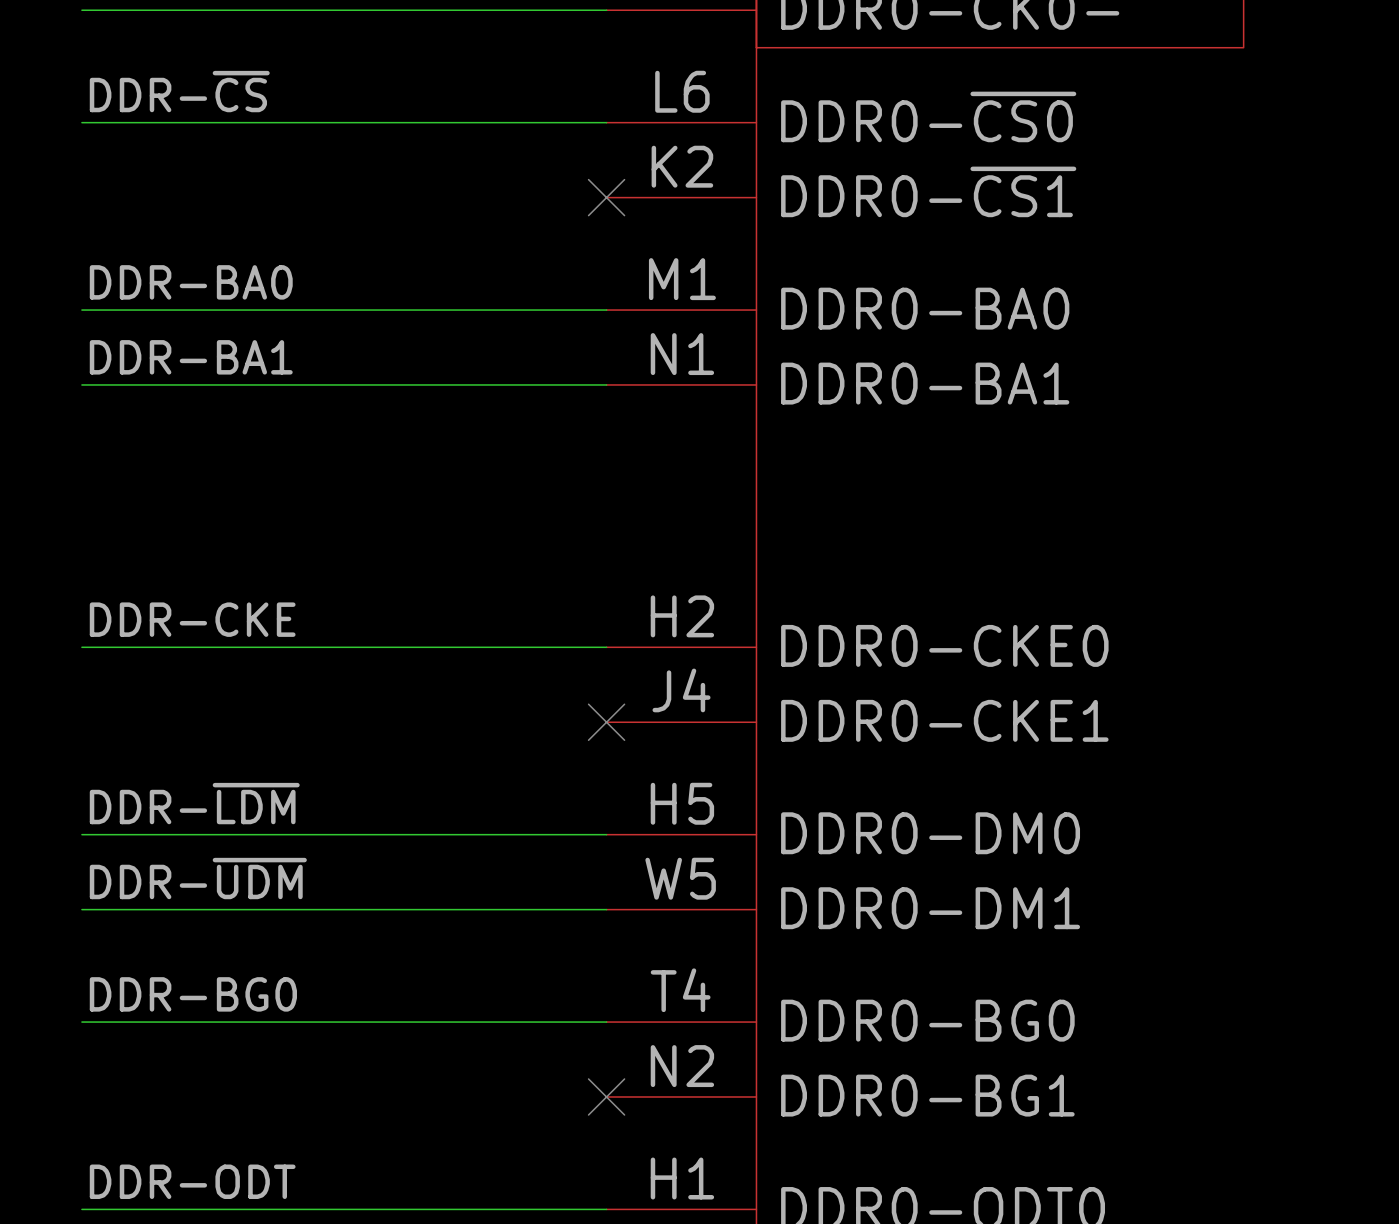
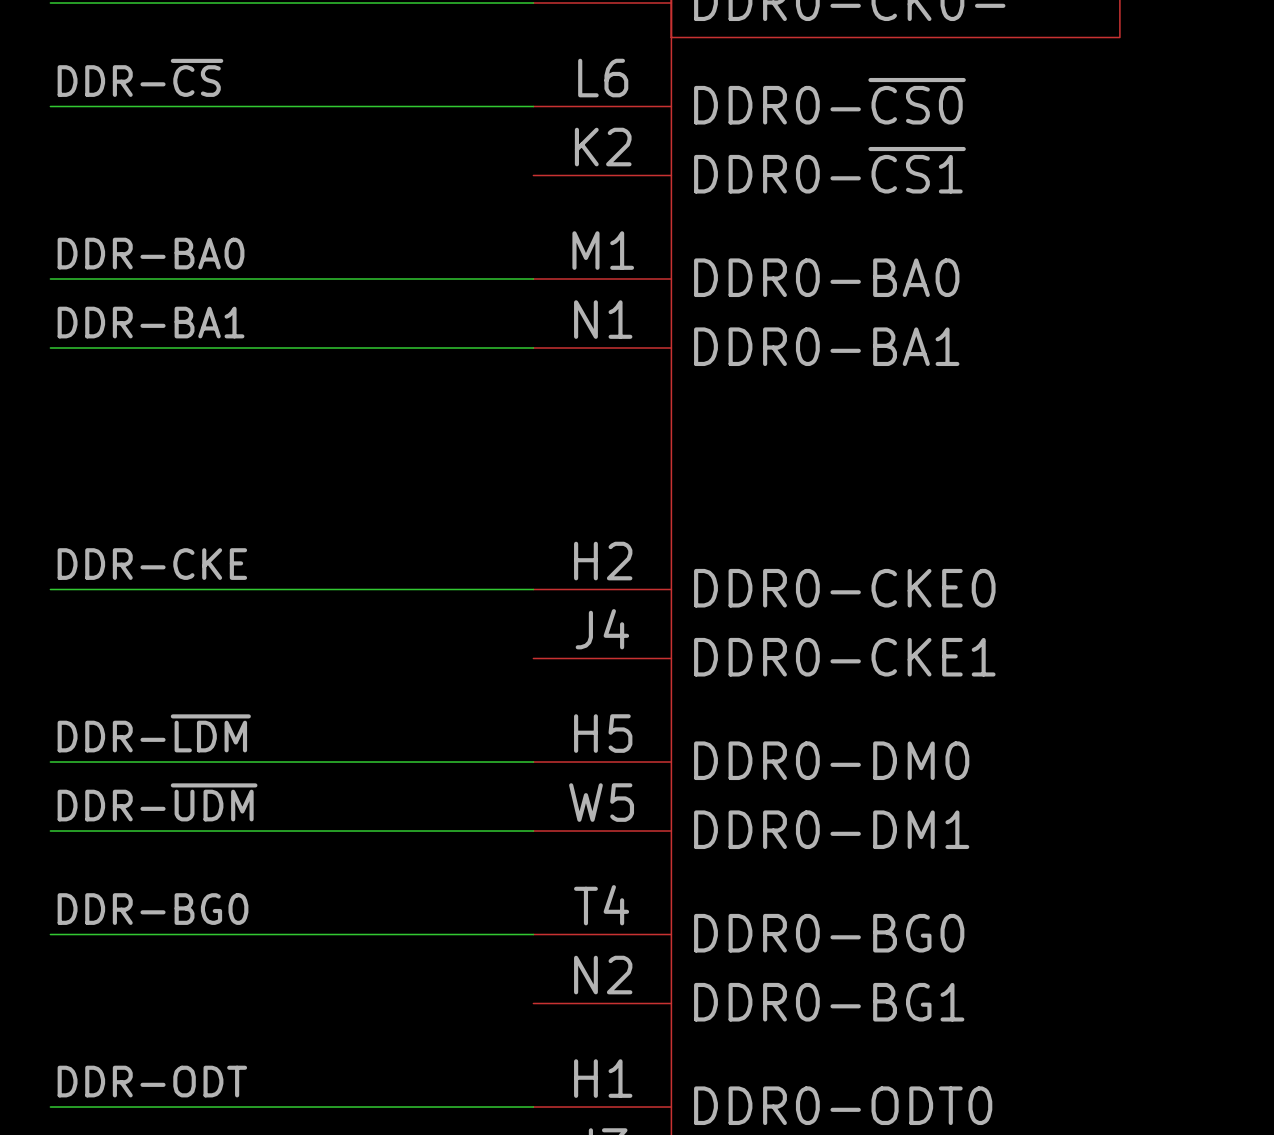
no-connect mark: (606, 197) -> none
no-connect mark: (606, 722) -> none
no-connect mark: (606, 1096) -> none

